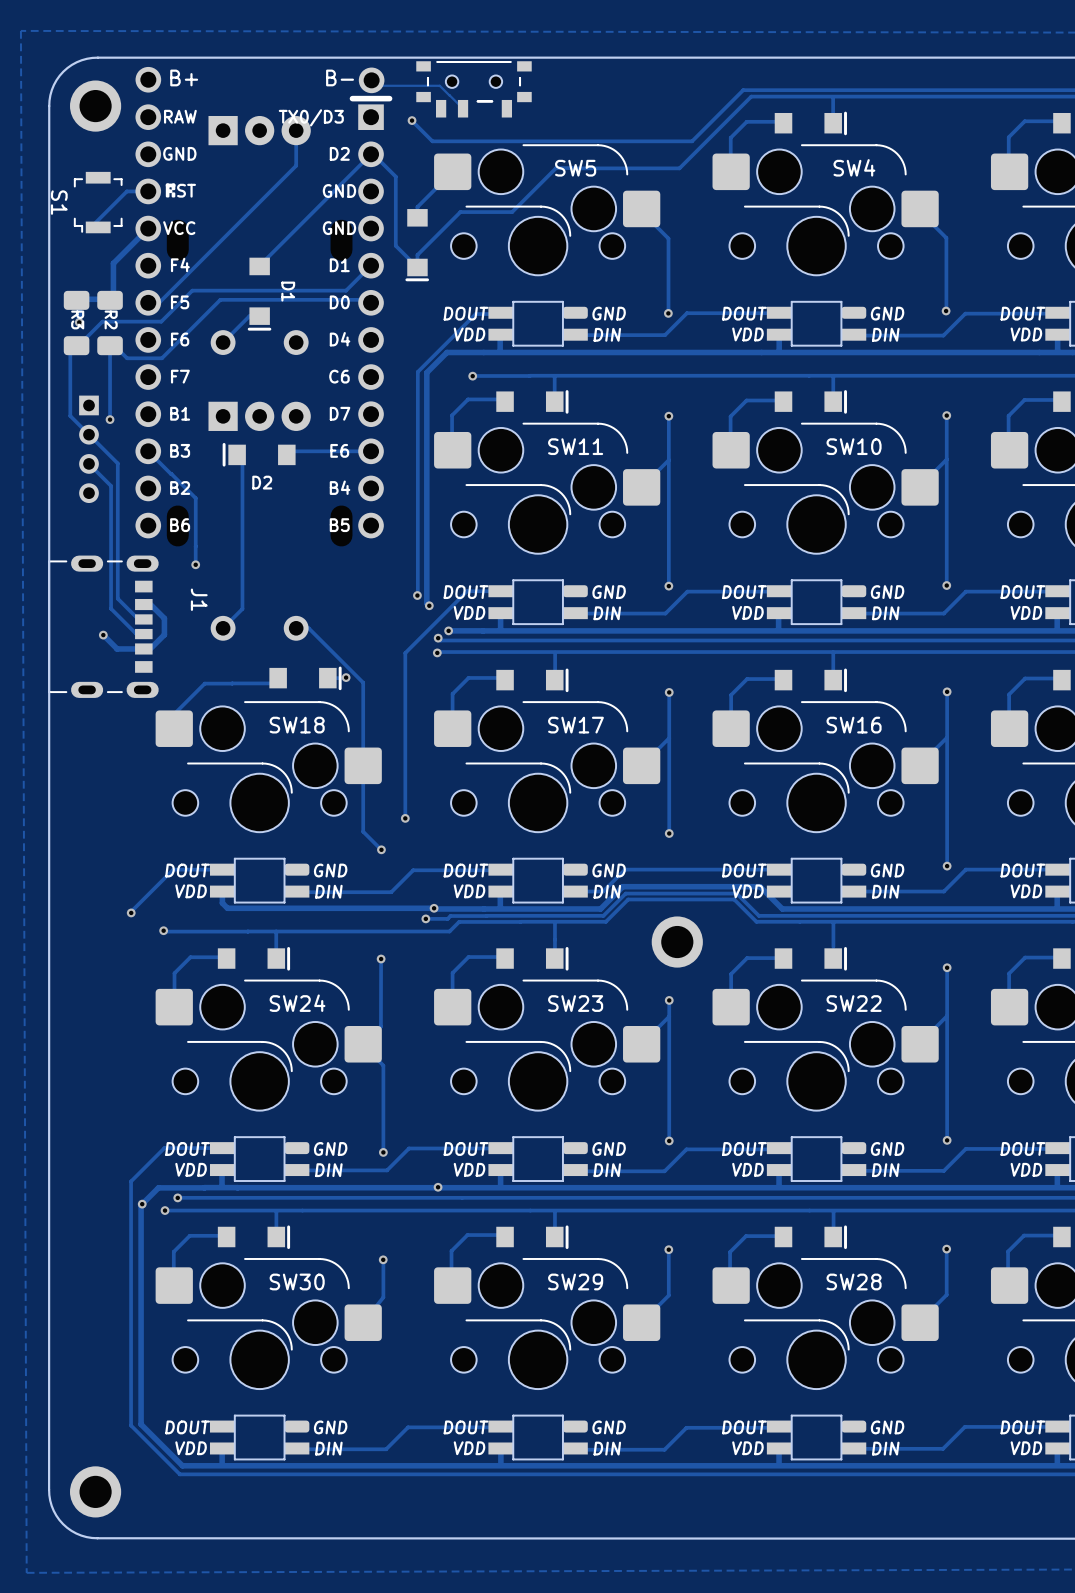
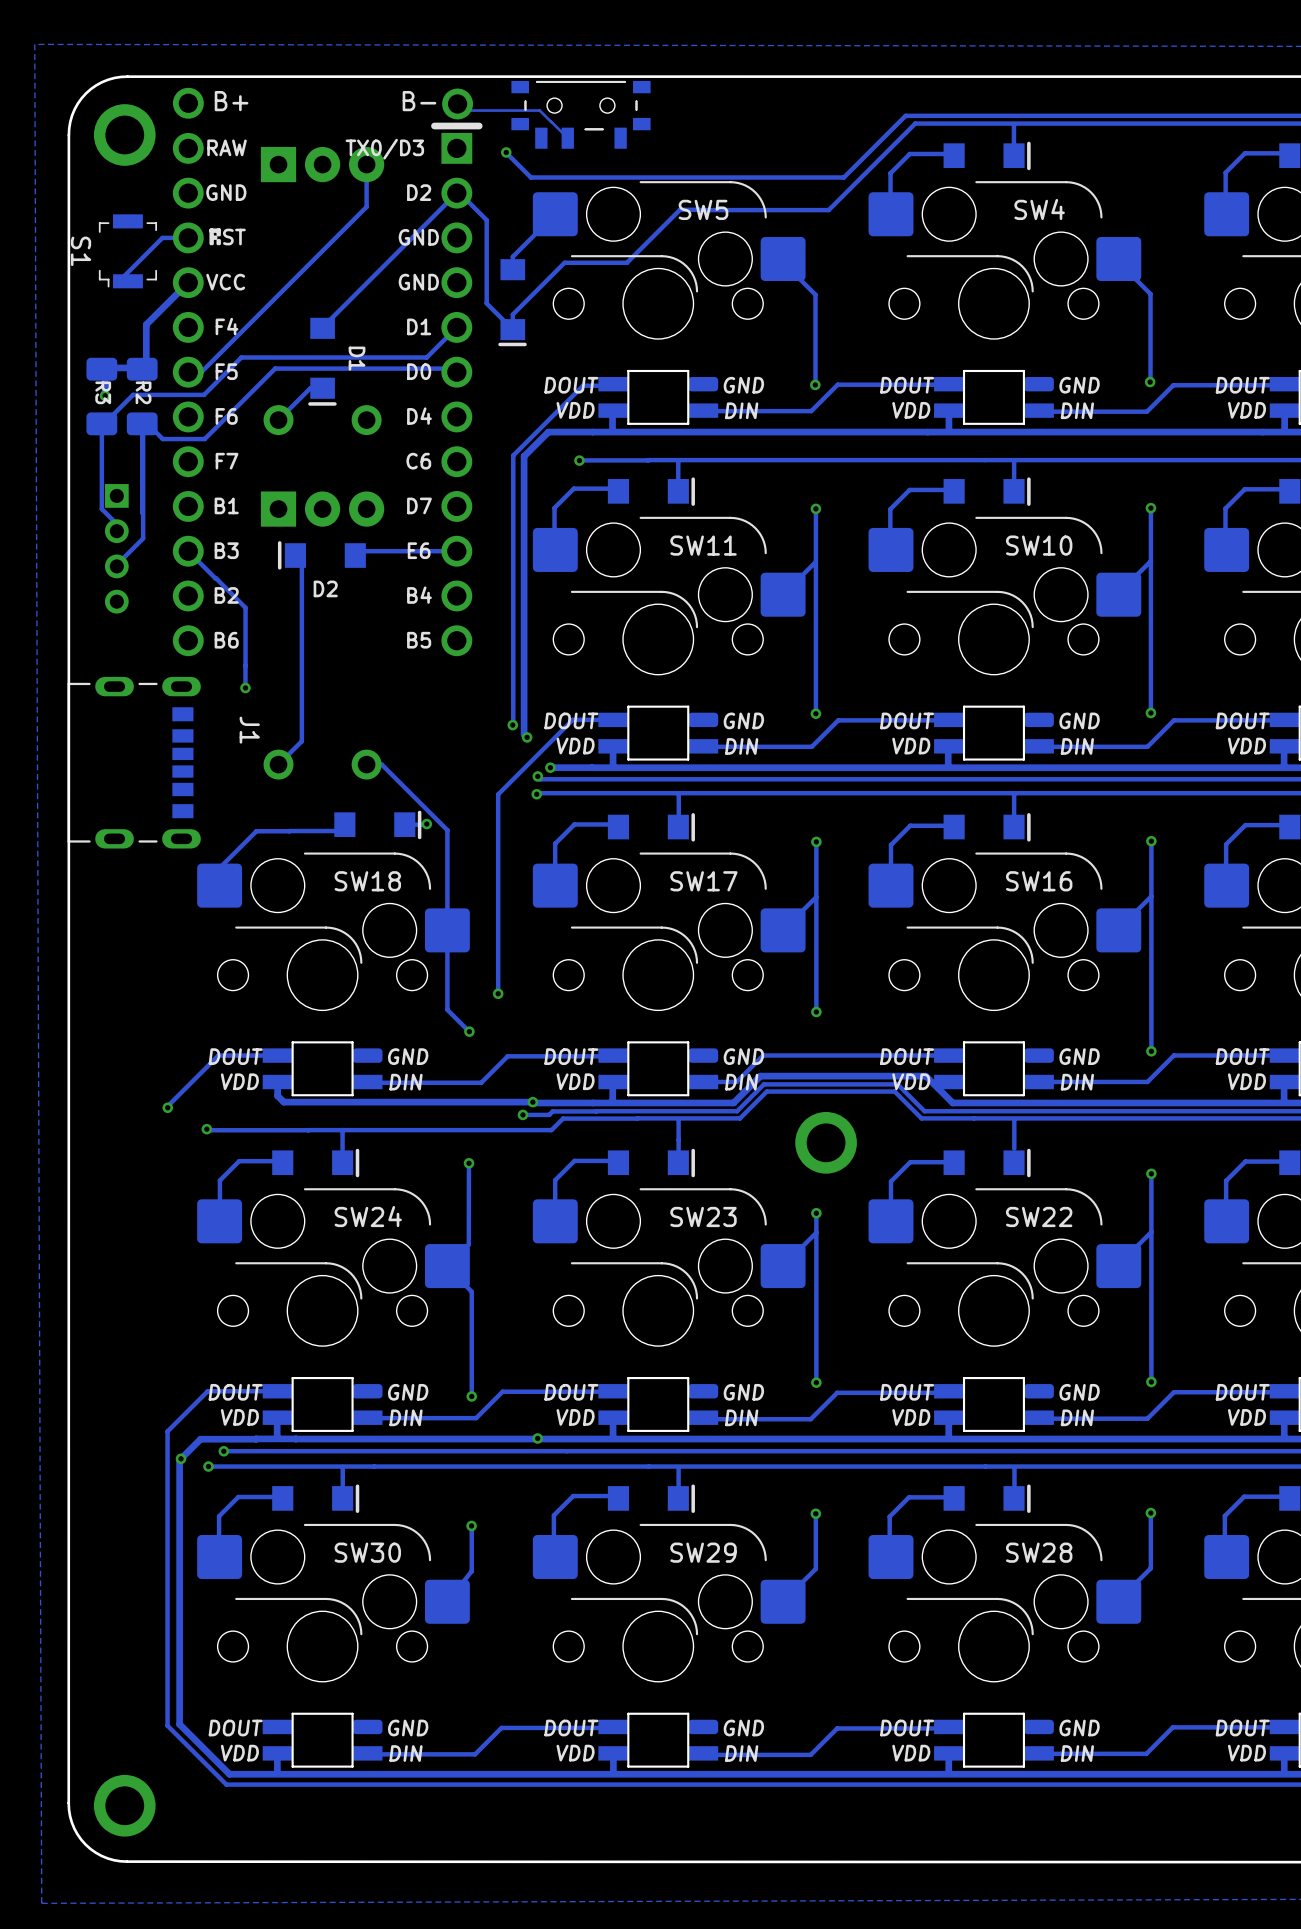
track: (76, 345) (70, 351) (70, 415) (117, 463) (117, 598) (138, 619) (143, 619) -> (101, 423) (101, 509) (122, 529)
track: none -> (143, 425) (143, 538) (115, 566)
via: (110, 419) -> none
track: (89, 463) (111, 485) (111, 608) (136, 634) (143, 634) -> none
track: (150, 604) (164, 618) (164, 634) (150, 648) -> none
track: (103, 635) (117, 648) -> none
via: (103, 635) -> none
track: (143, 648) (117, 648) -> none

